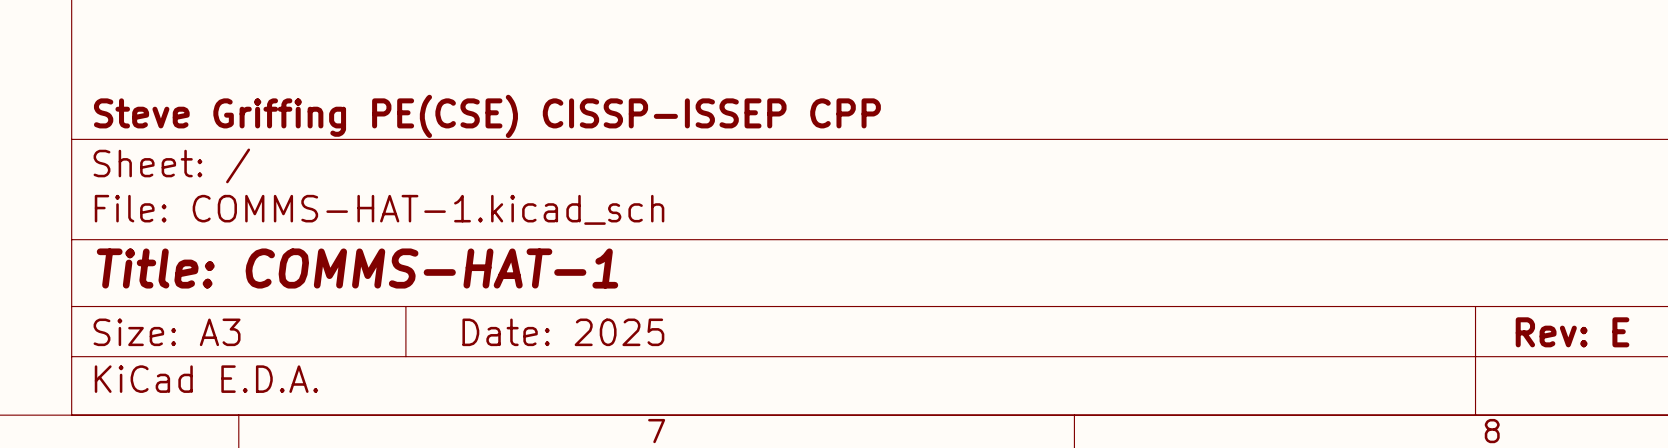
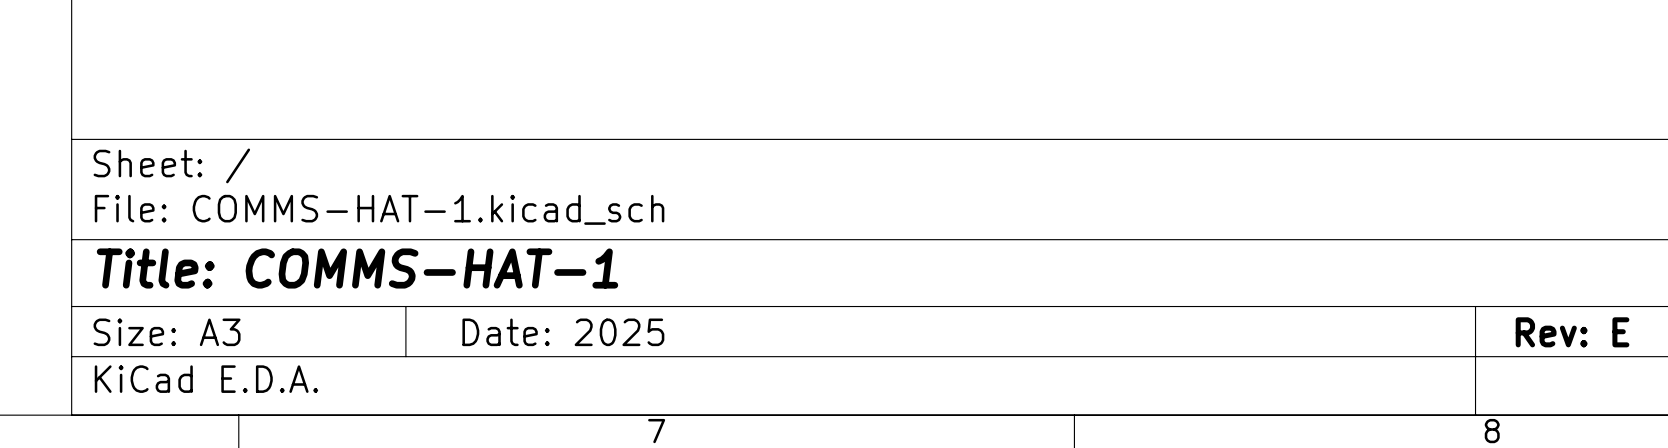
title block: Steve Griffing PE(CSE) CISSP-ISSEP CPP (487, 116) -> none

